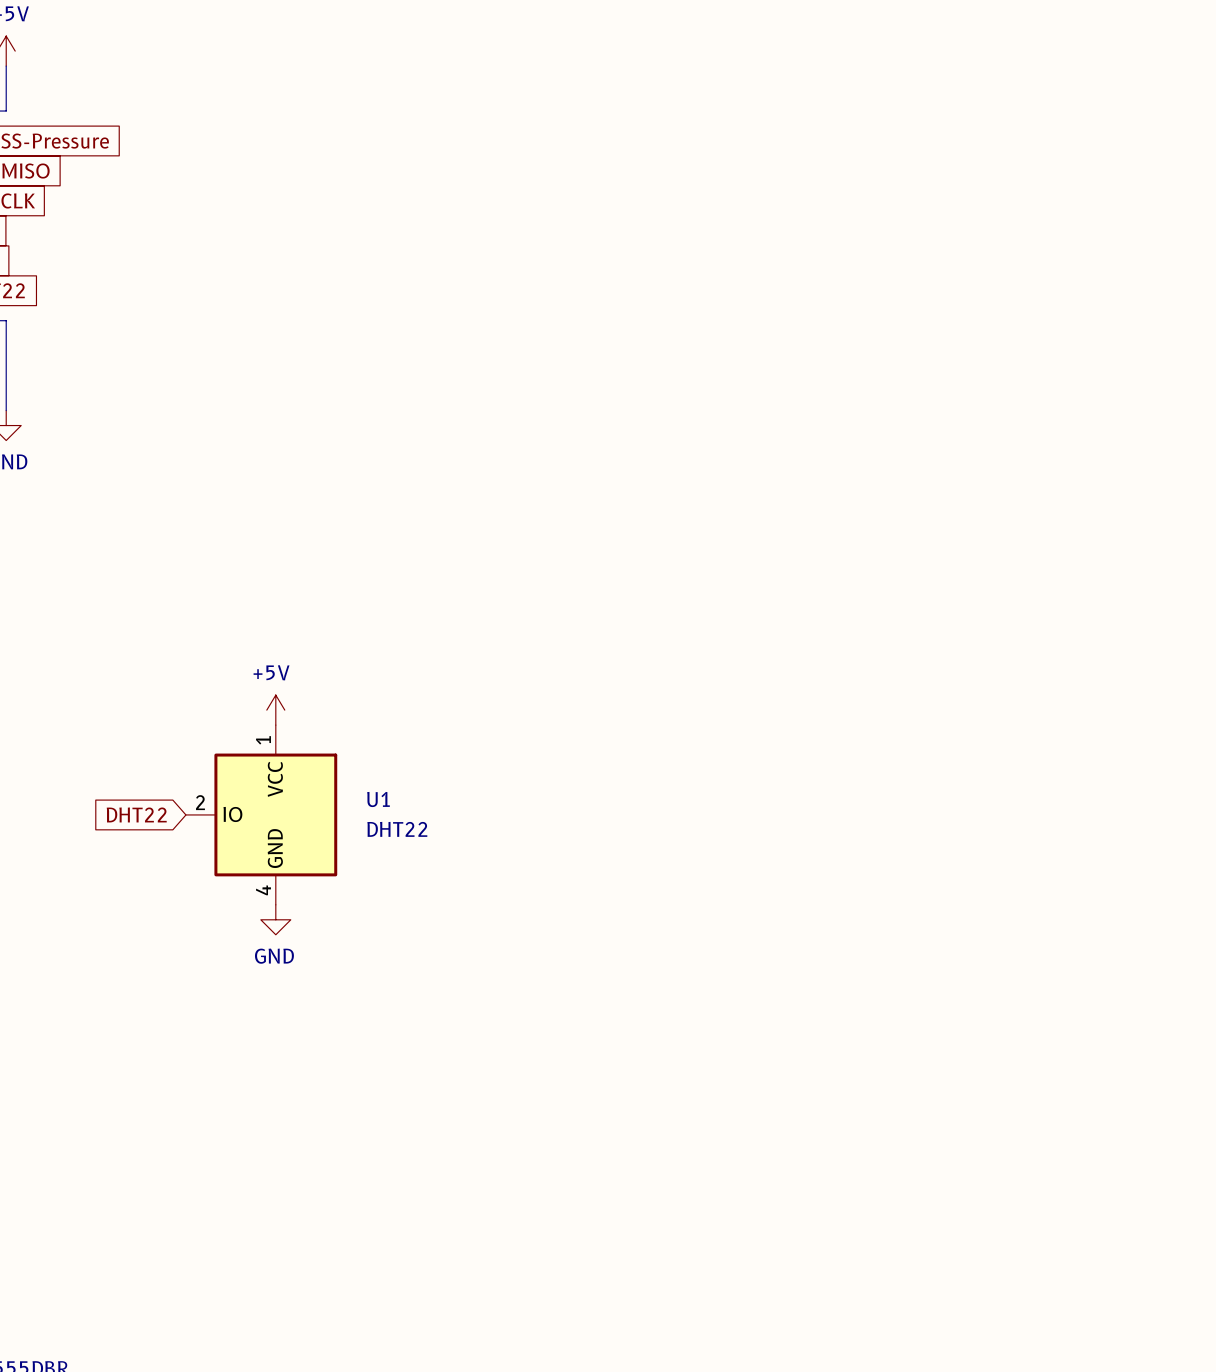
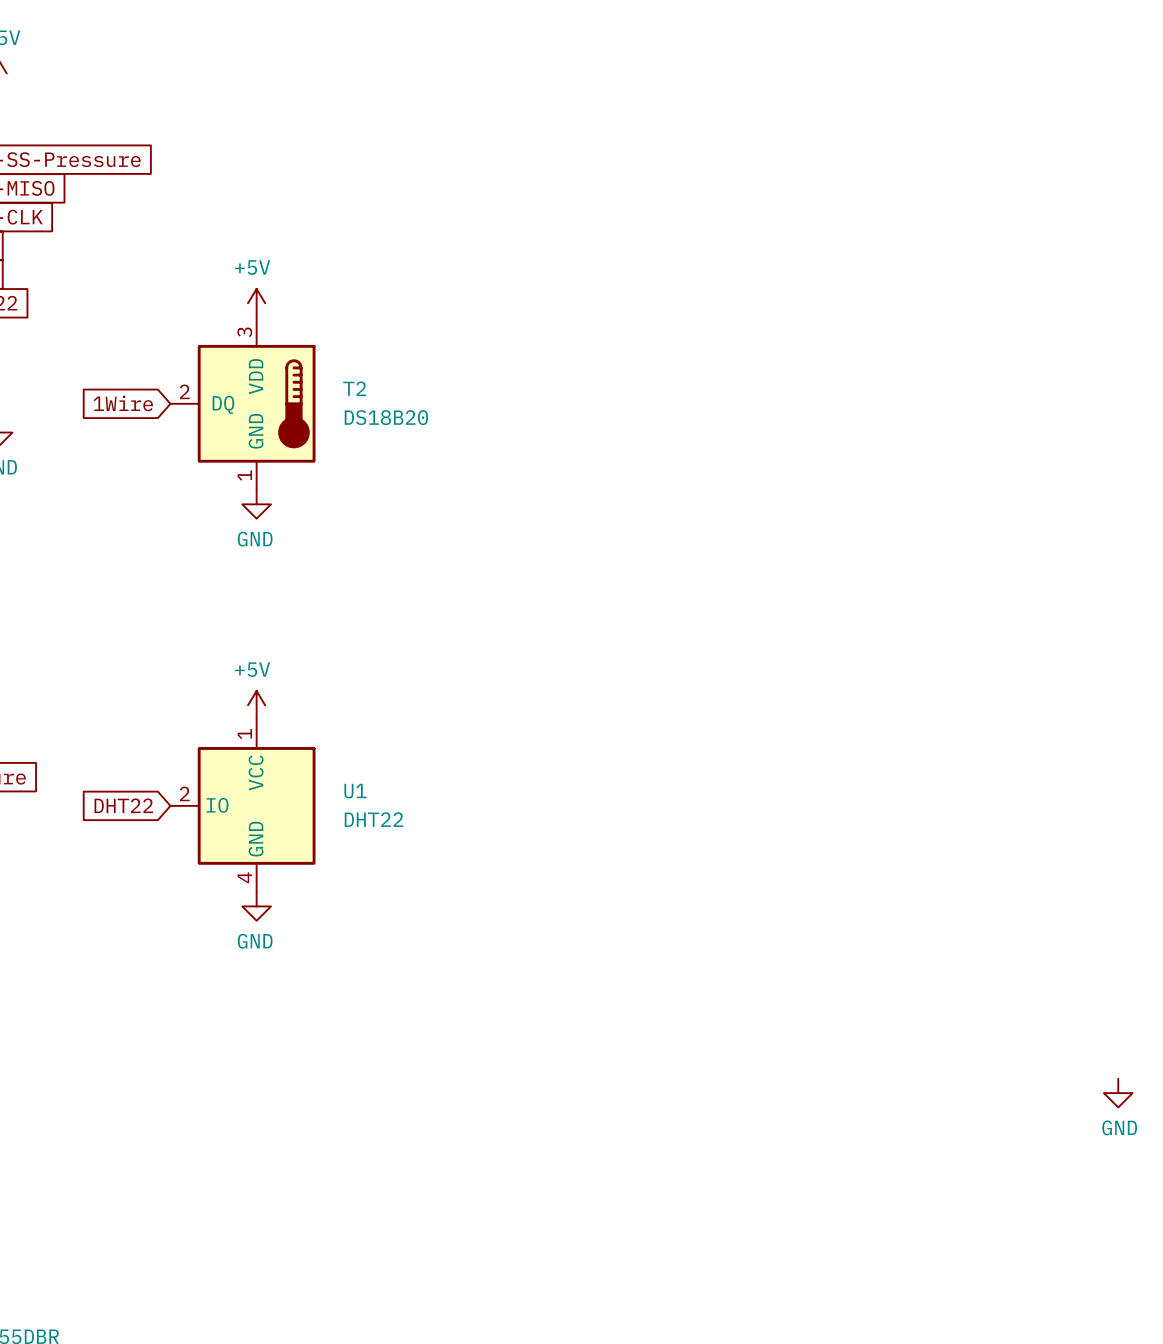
power symbol: none -> +5V (256, 303)
global label: none -> 1Wire (123, 403)
T2: none -> DS18B20 (242, 403)
power symbol: none -> GND (256, 504)
power symbol: none -> GND (1118, 1093)

